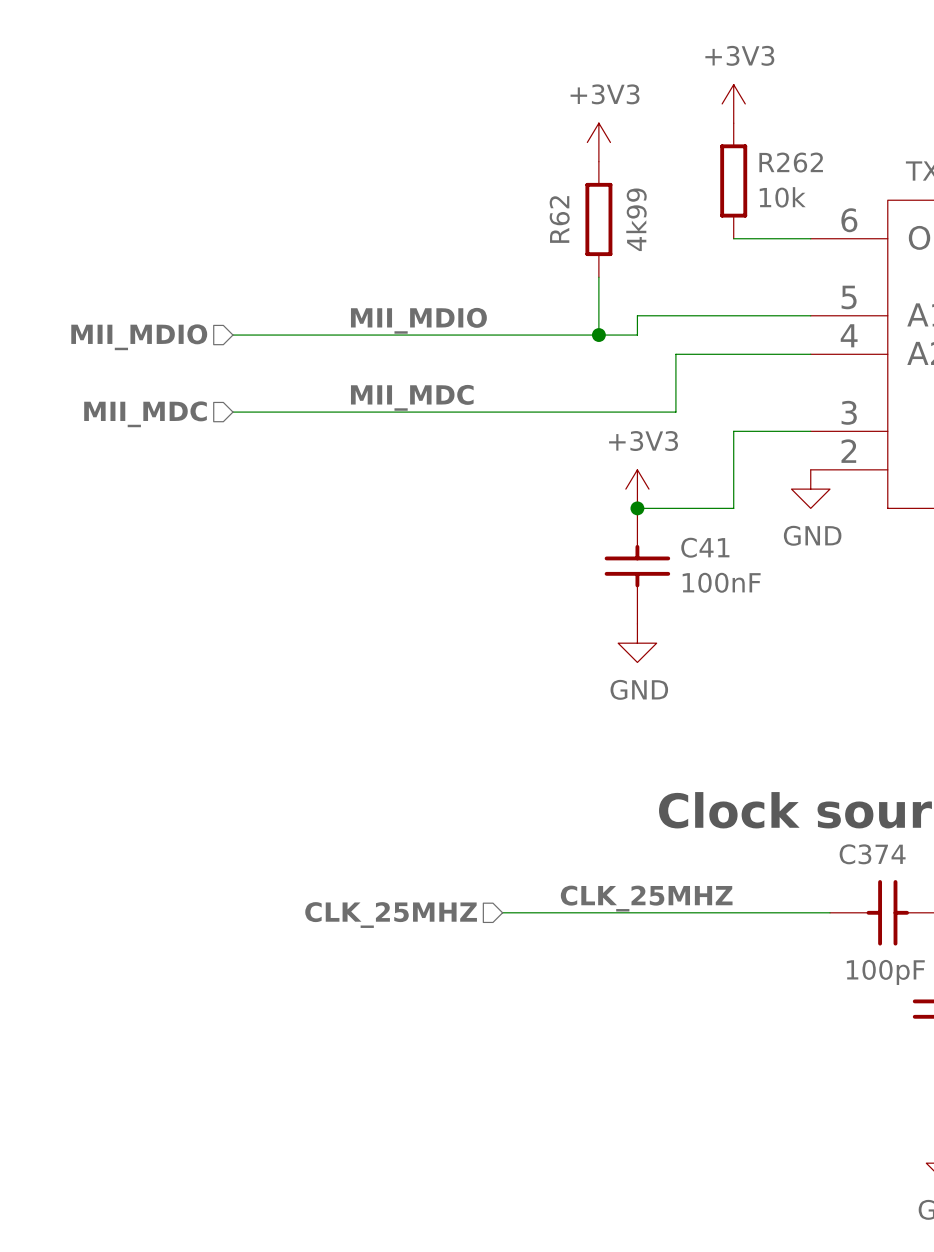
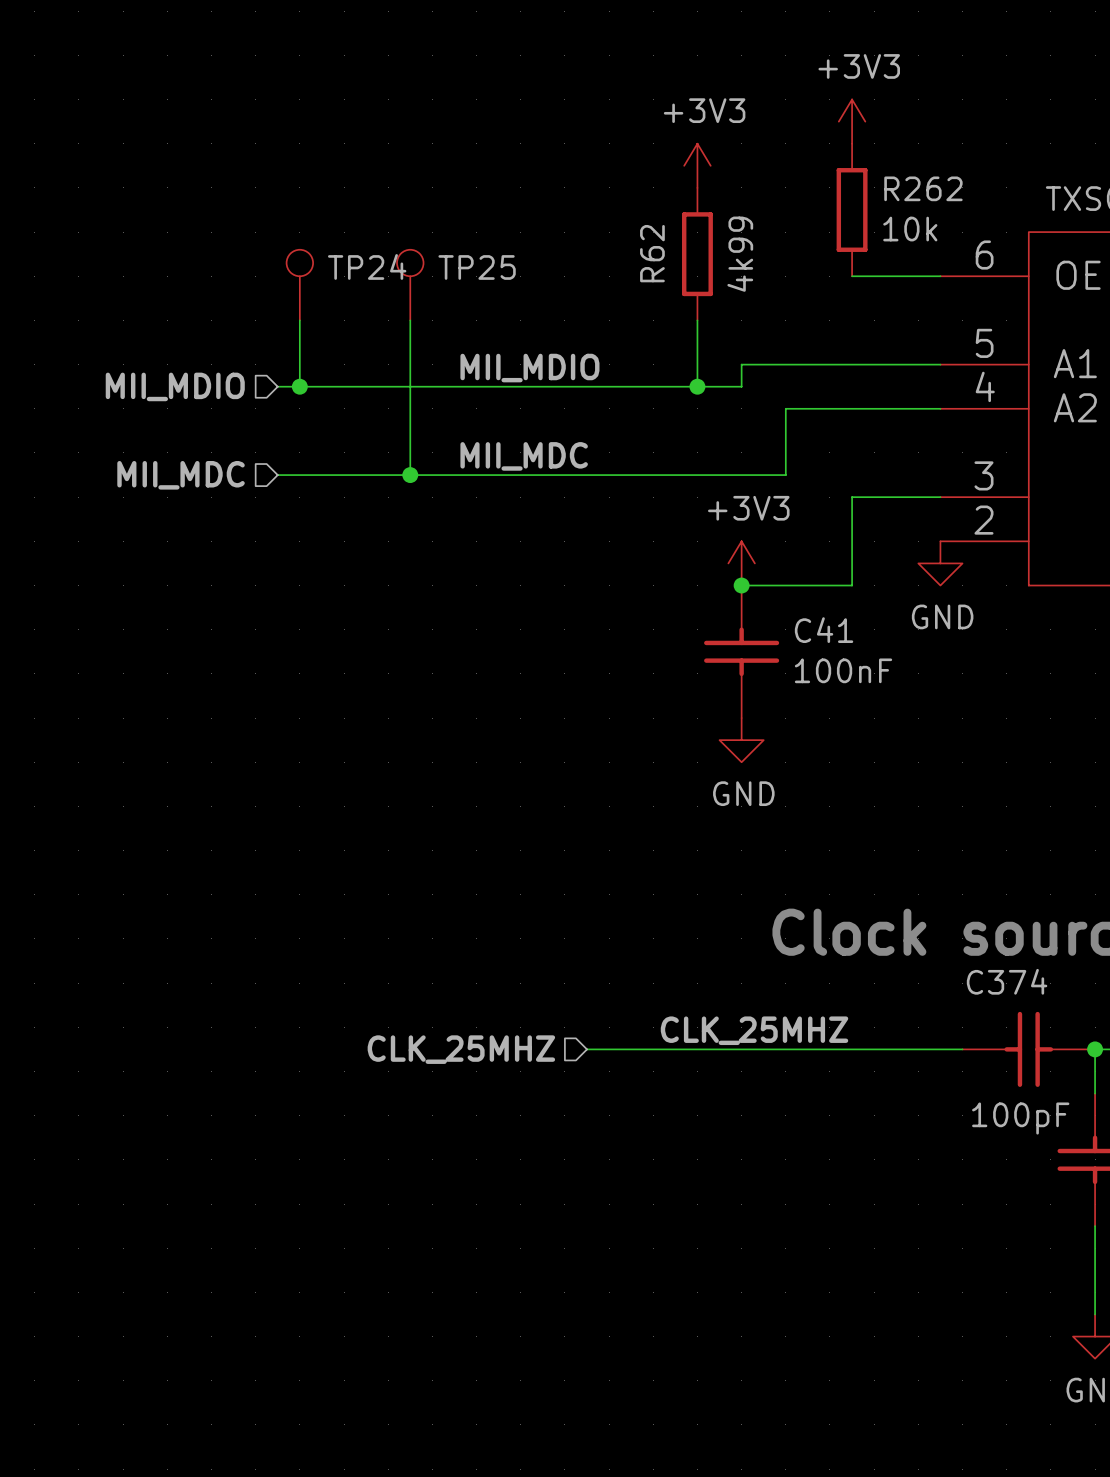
TP24: none -> (299, 285)
TP25: none -> (410, 285)
wire: none -> (299, 320) (299, 386)
wire: none -> (410, 320) (410, 475)
label position: MII_MDIO (418, 320) -> MII_MDIO (529, 368)
junction: none -> (299, 386)
label position: MII_MDC (412, 397) -> MII_MDC (524, 456)
junction: none -> (410, 475)

